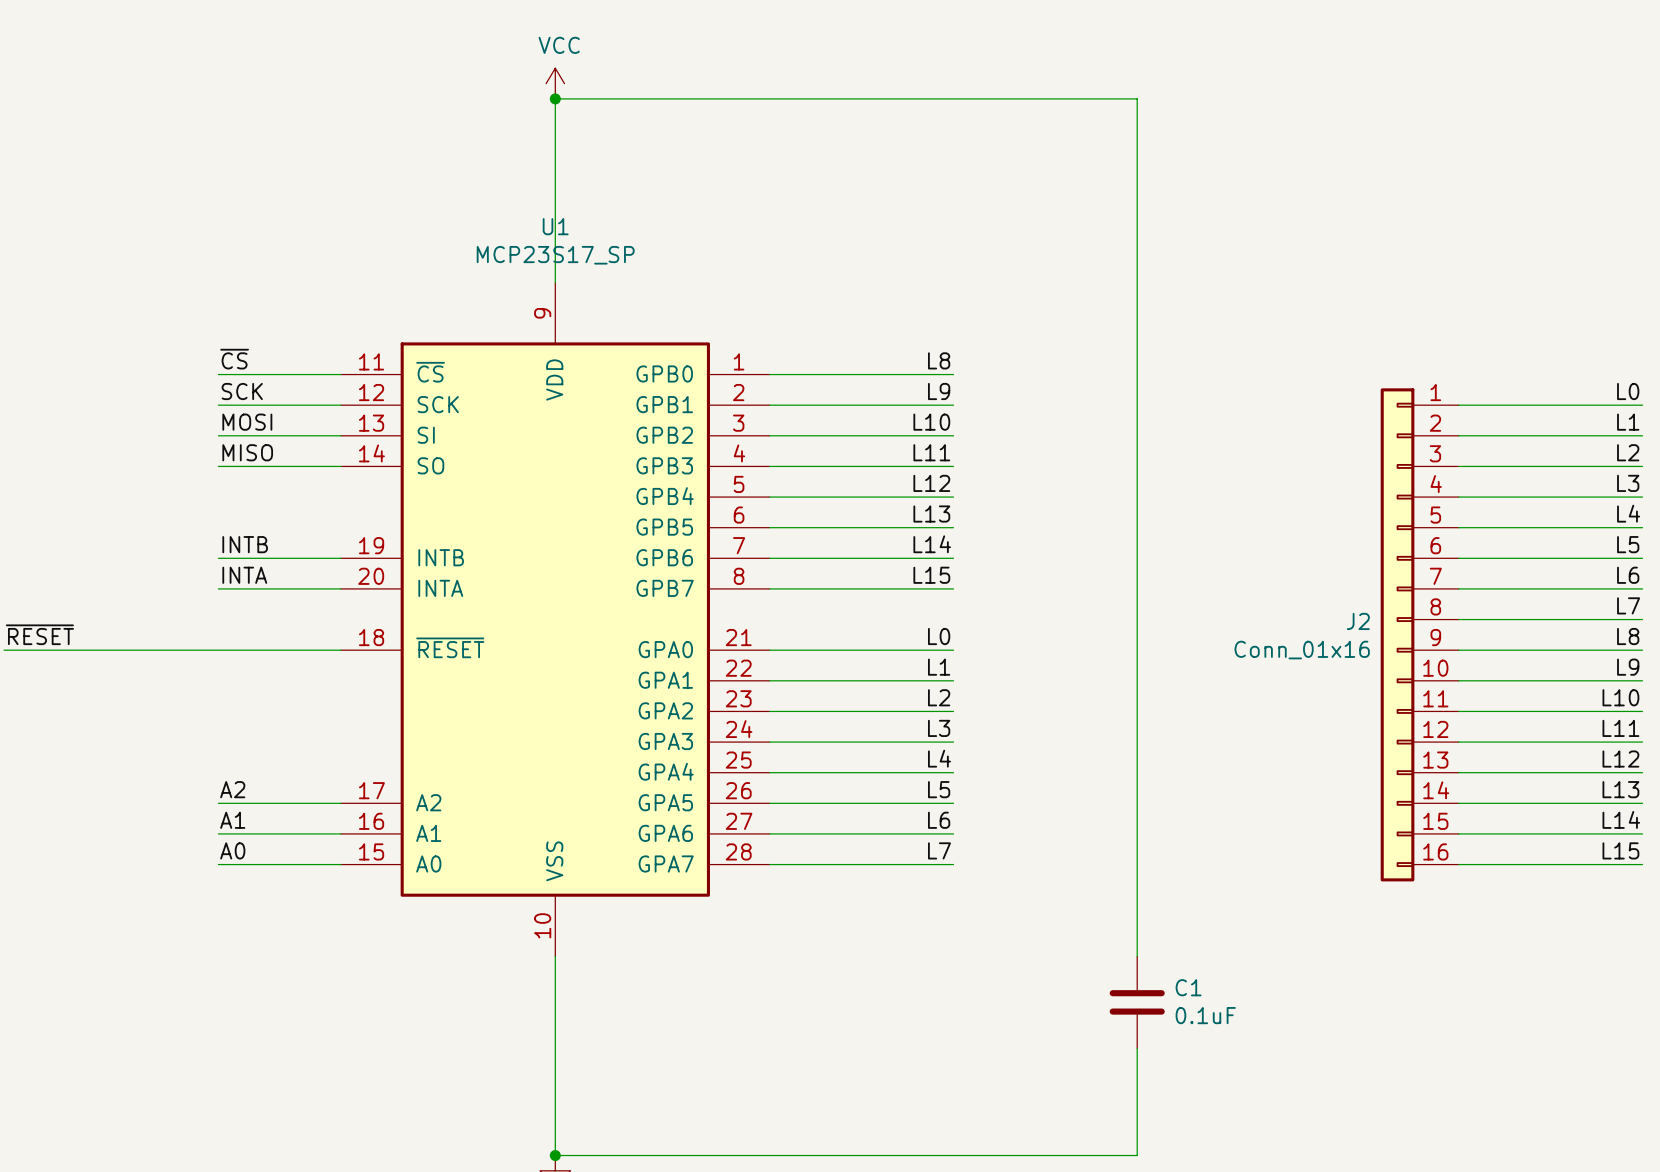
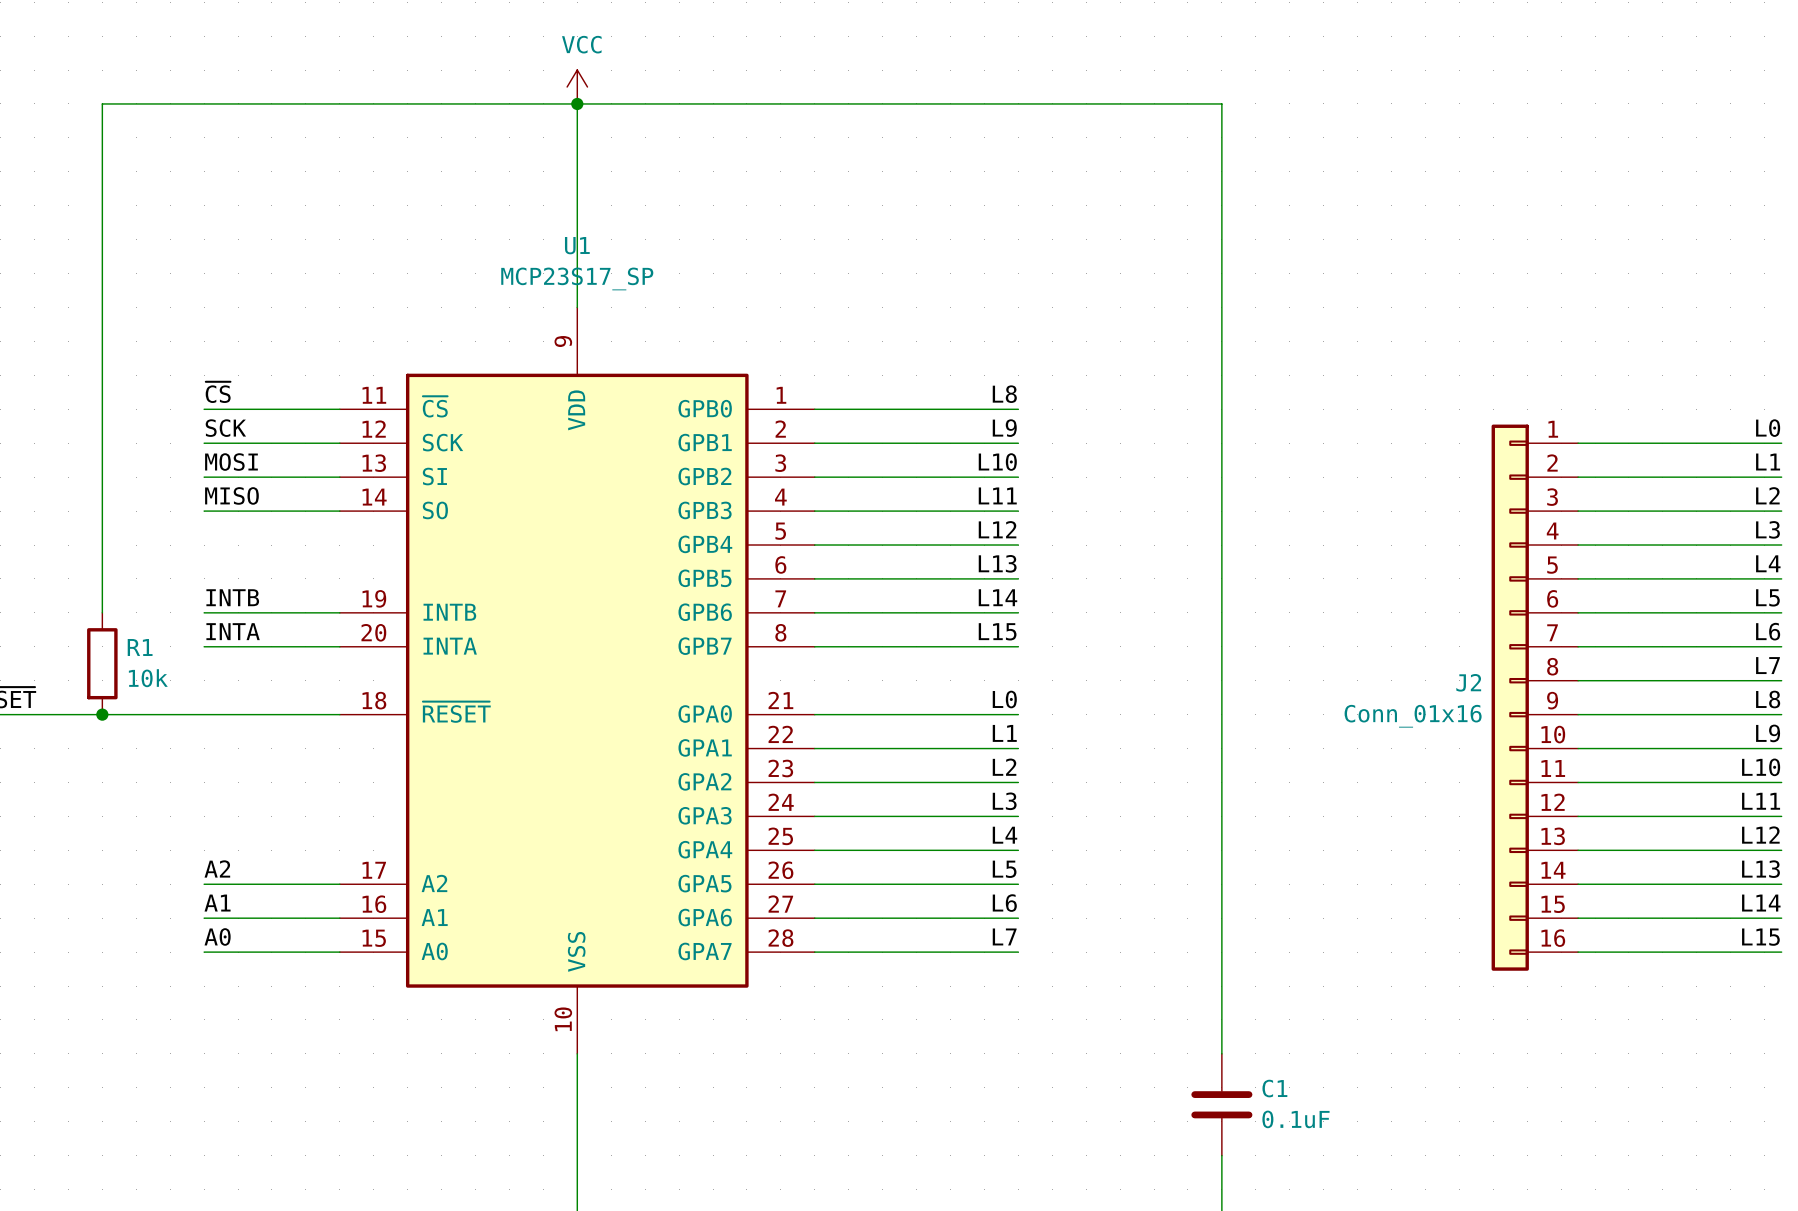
wire: none -> (577, 103) (102, 103) (102, 612)
R1: none -> 10k (102, 663)
junction: none -> (102, 714)

